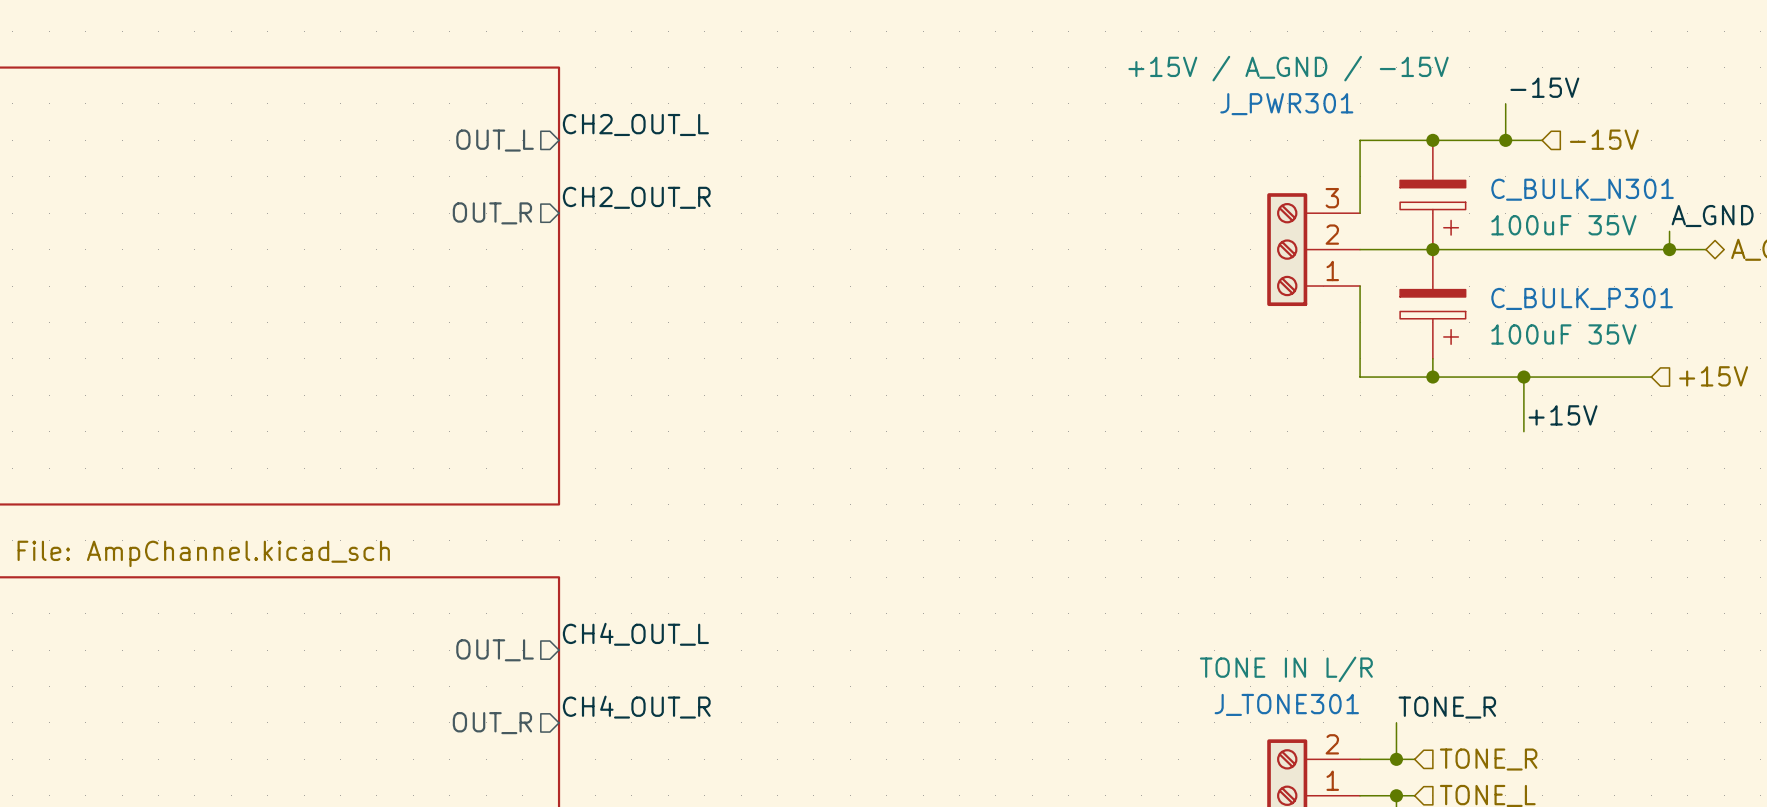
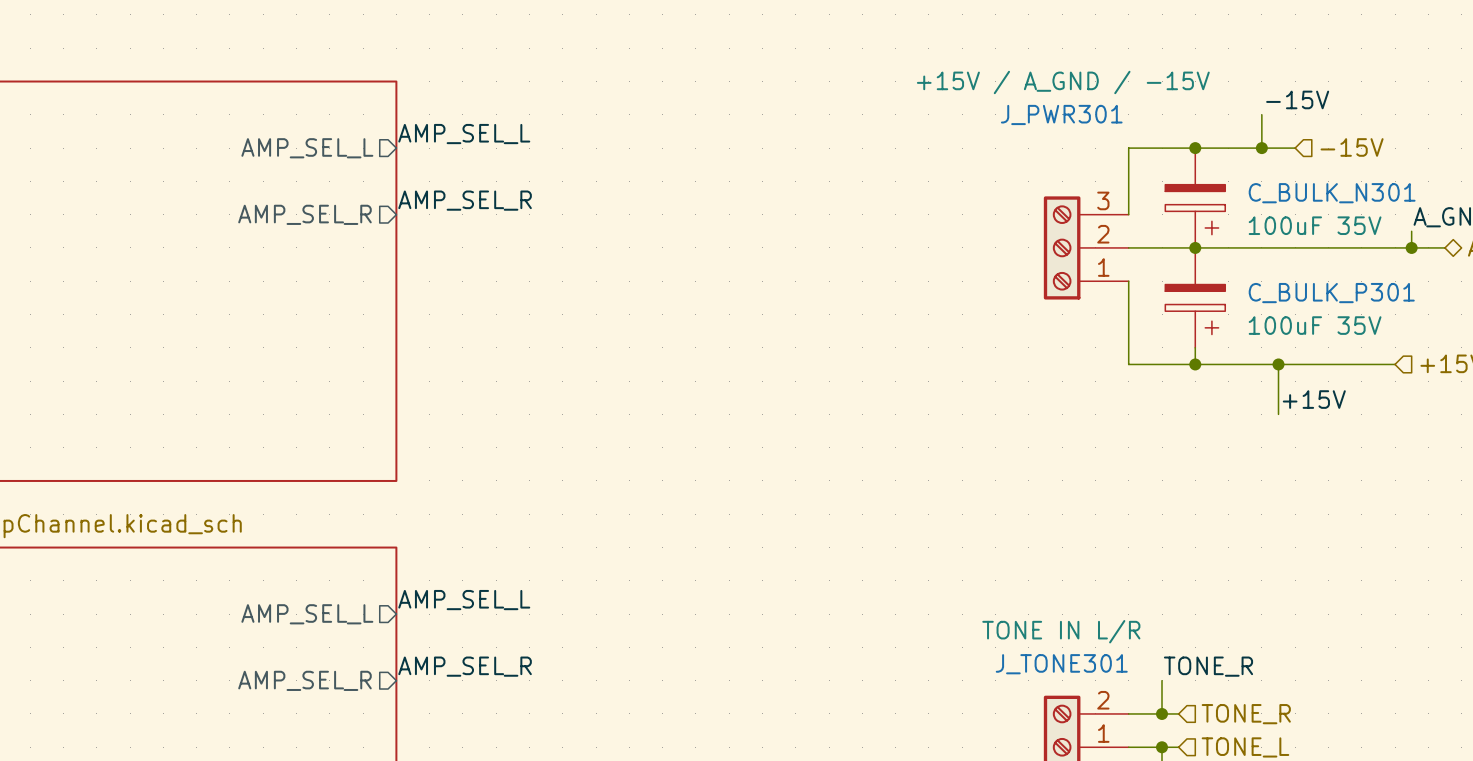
label: CH2_OUT_L (635, 124) -> AMP_SEL_L (464, 134)
sheet pin: OUT_L (495, 140) -> AMP_SEL_L (307, 148)
label: CH2_OUT_R (636, 197) -> AMP_SEL_R (465, 200)
sheet pin: OUT_R (492, 213) -> AMP_SEL_R (304, 214)
label: CH4_OUT_L (635, 634) -> AMP_SEL_L (464, 600)
sheet pin: OUT_L (495, 650) -> AMP_SEL_L (307, 614)
label: CH4_OUT_R (636, 707) -> AMP_SEL_R (465, 666)
sheet pin: OUT_R (492, 723) -> AMP_SEL_R (304, 680)

